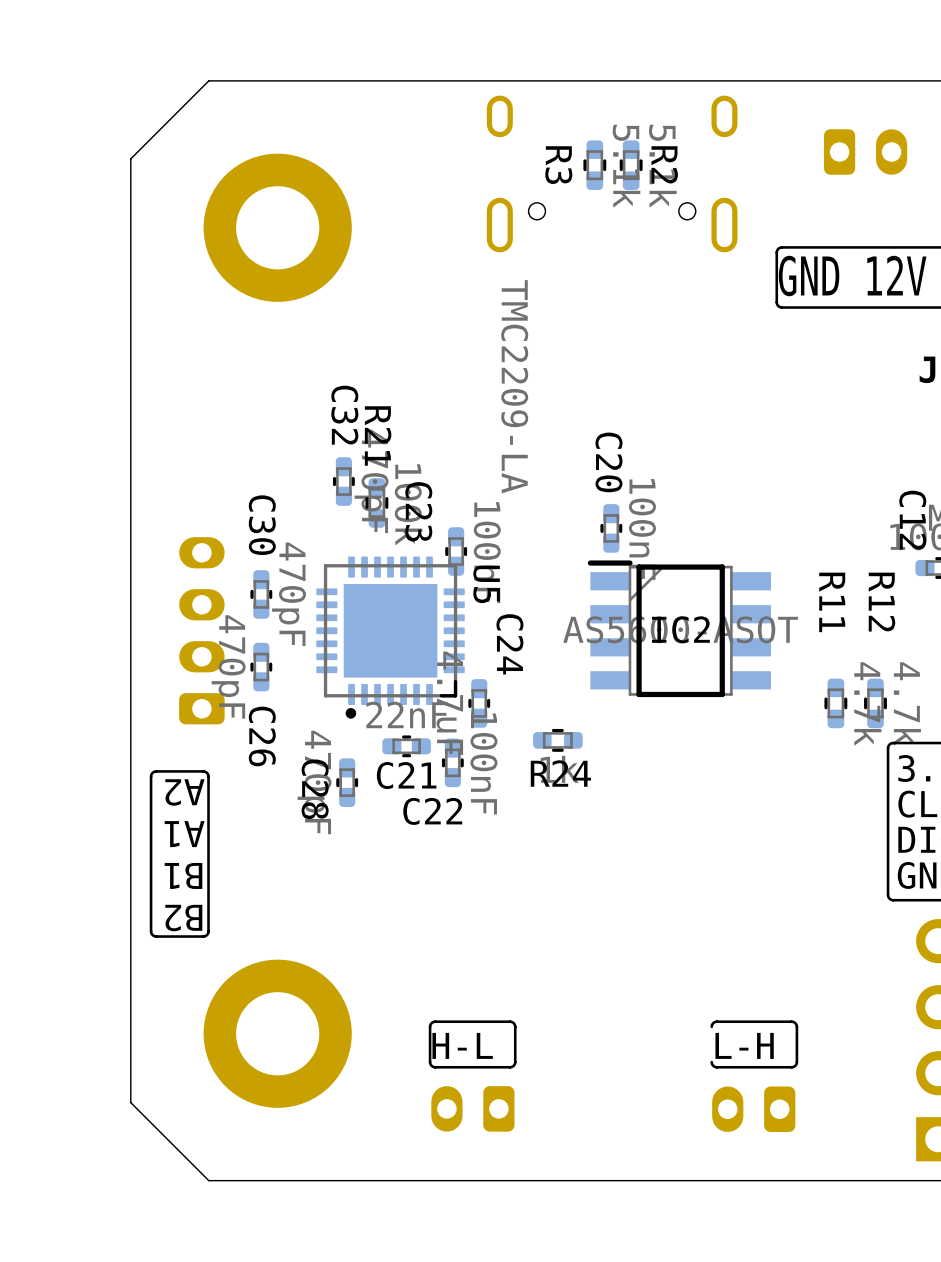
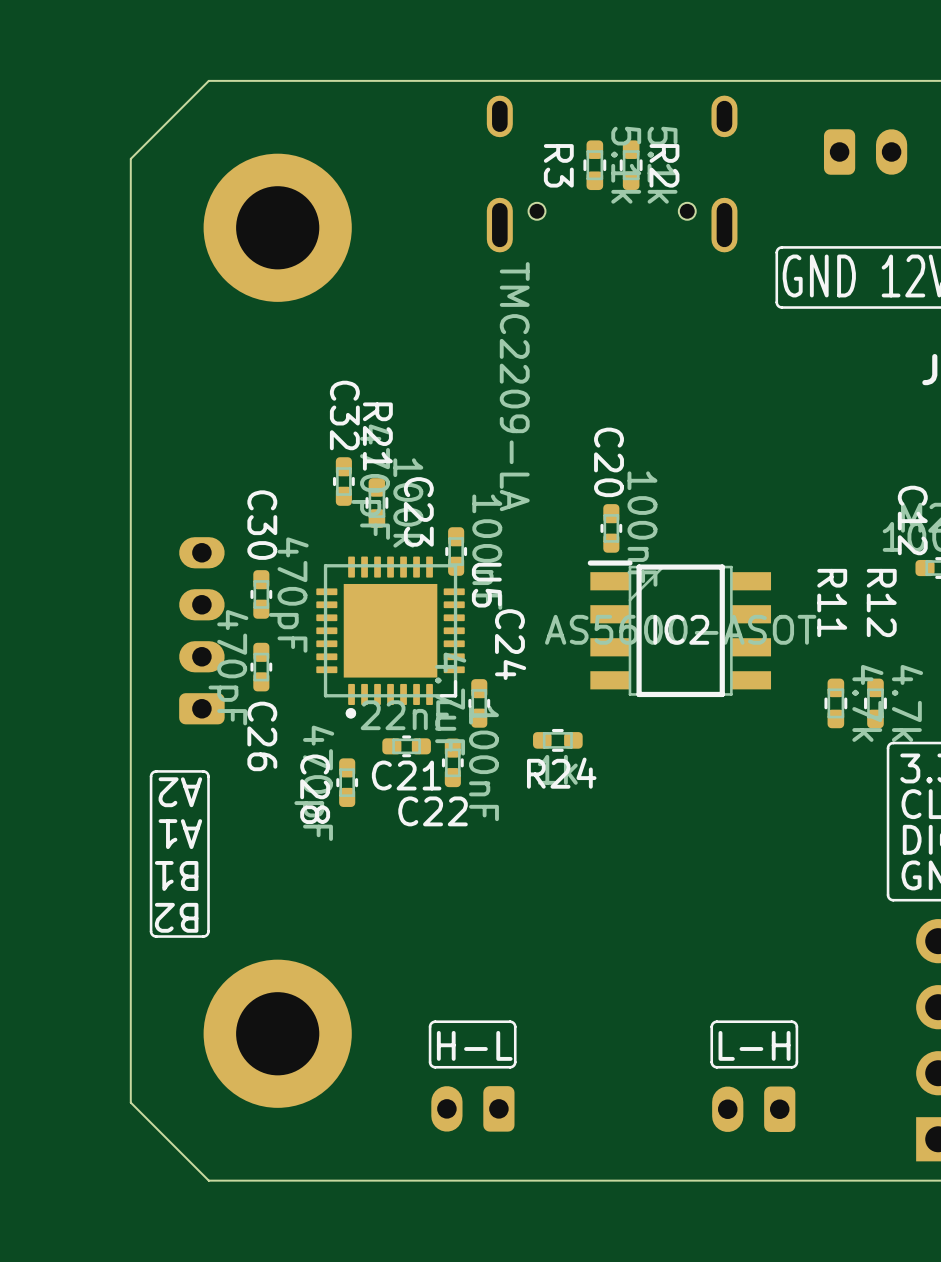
line: none -> (711, 1026) (711, 1062)

